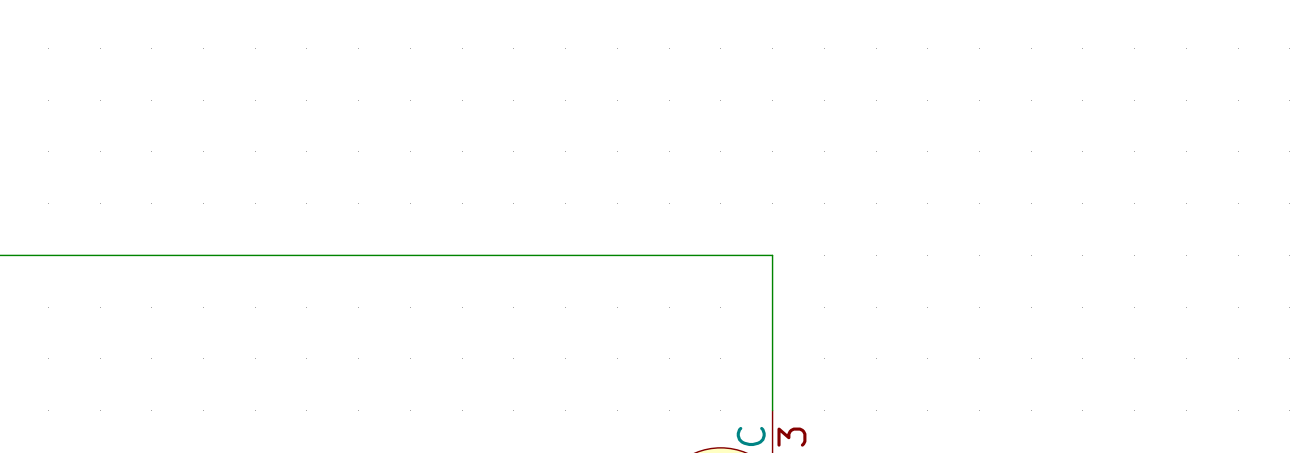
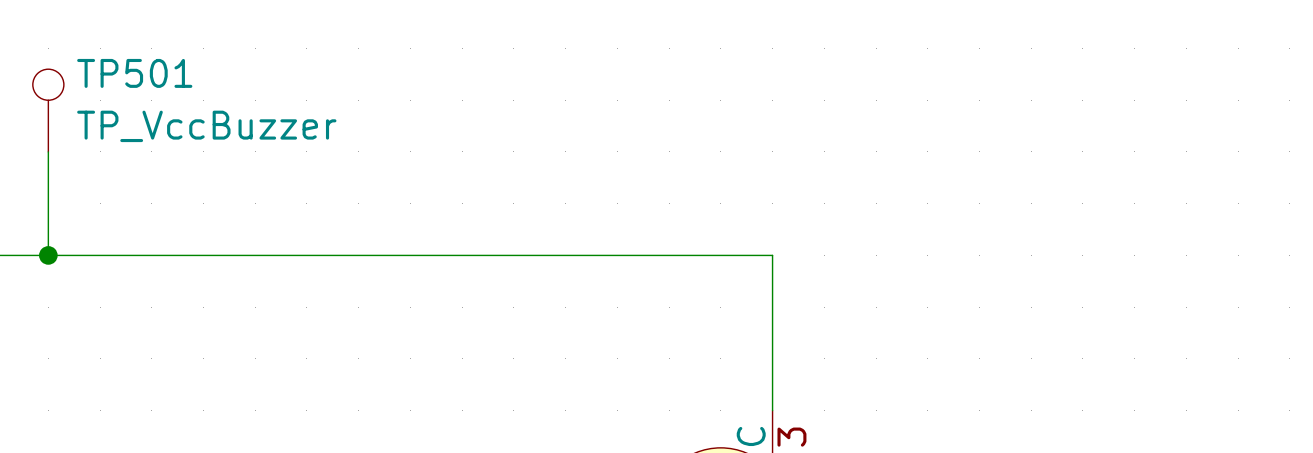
TP501: none -> TP_VccBuzzer (48, 110)
wire: none -> (48, 151) (48, 255)
junction: none -> (48, 255)

